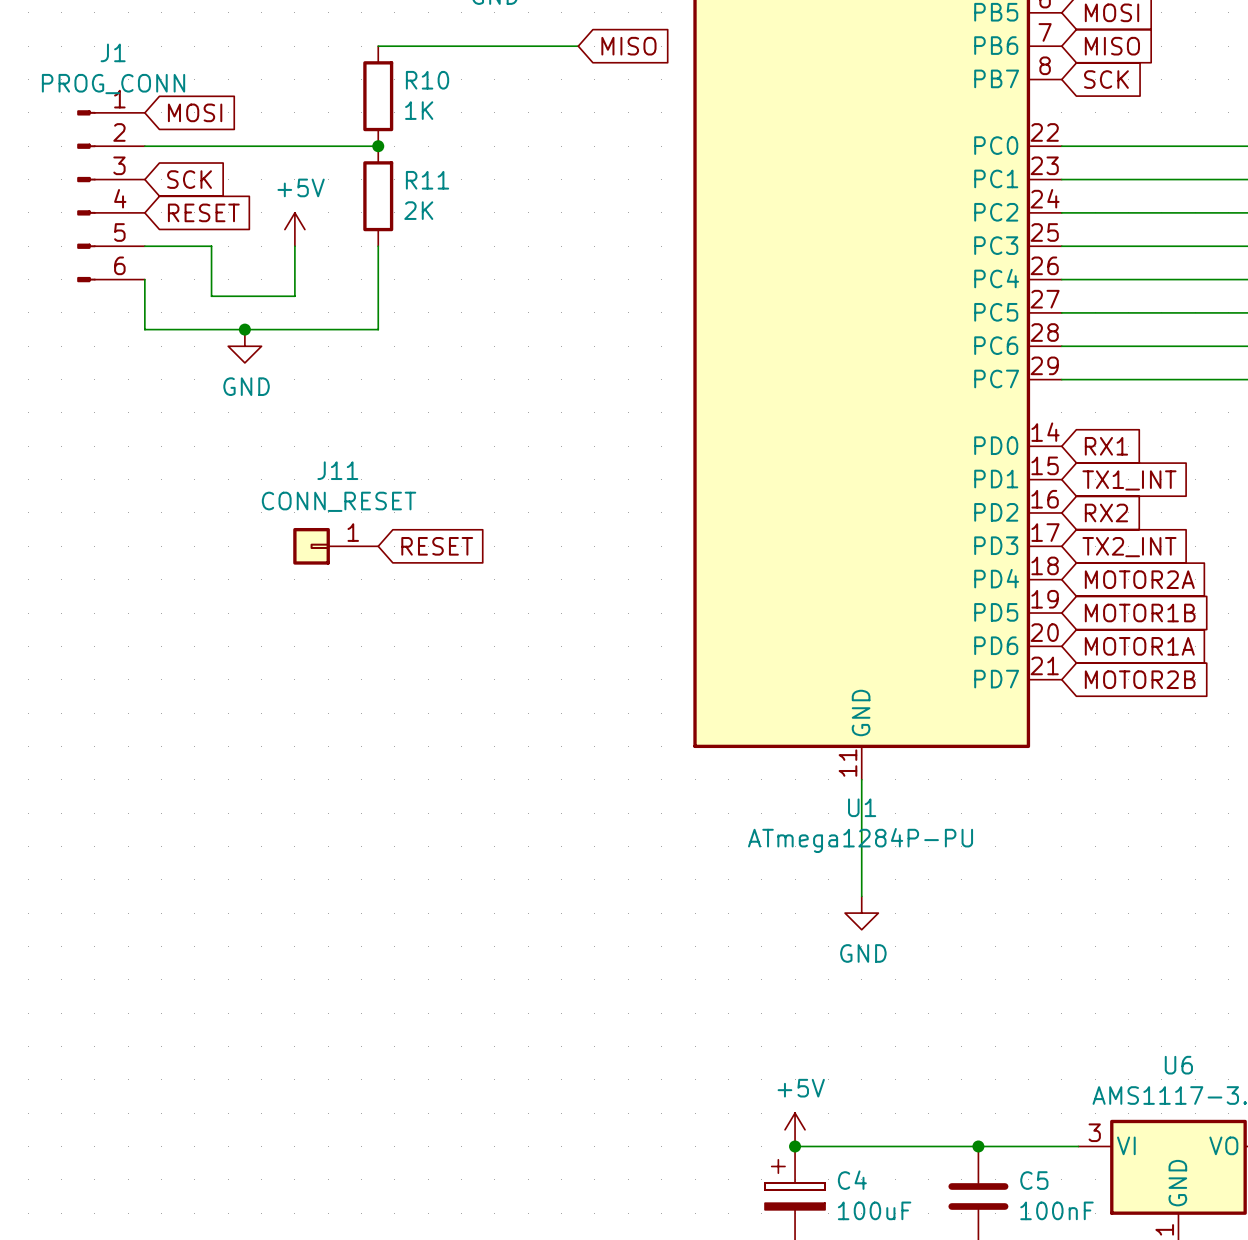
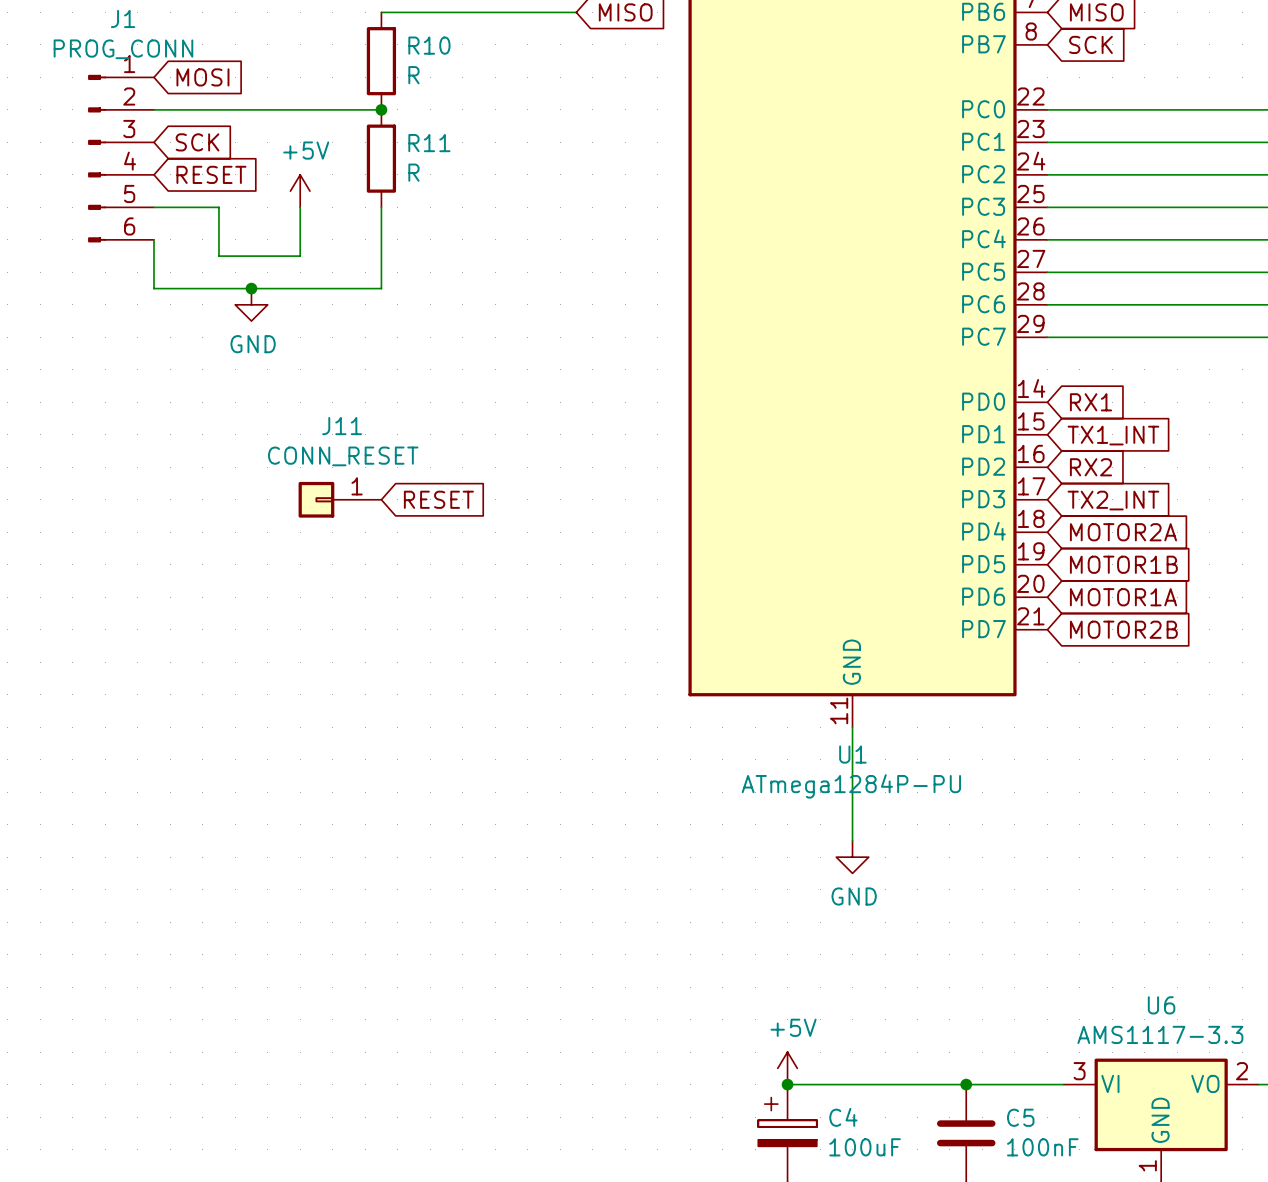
R10 value: 1K (419, 110) -> R (413, 75)
R11 value: 2K (418, 210) -> R (413, 172)

